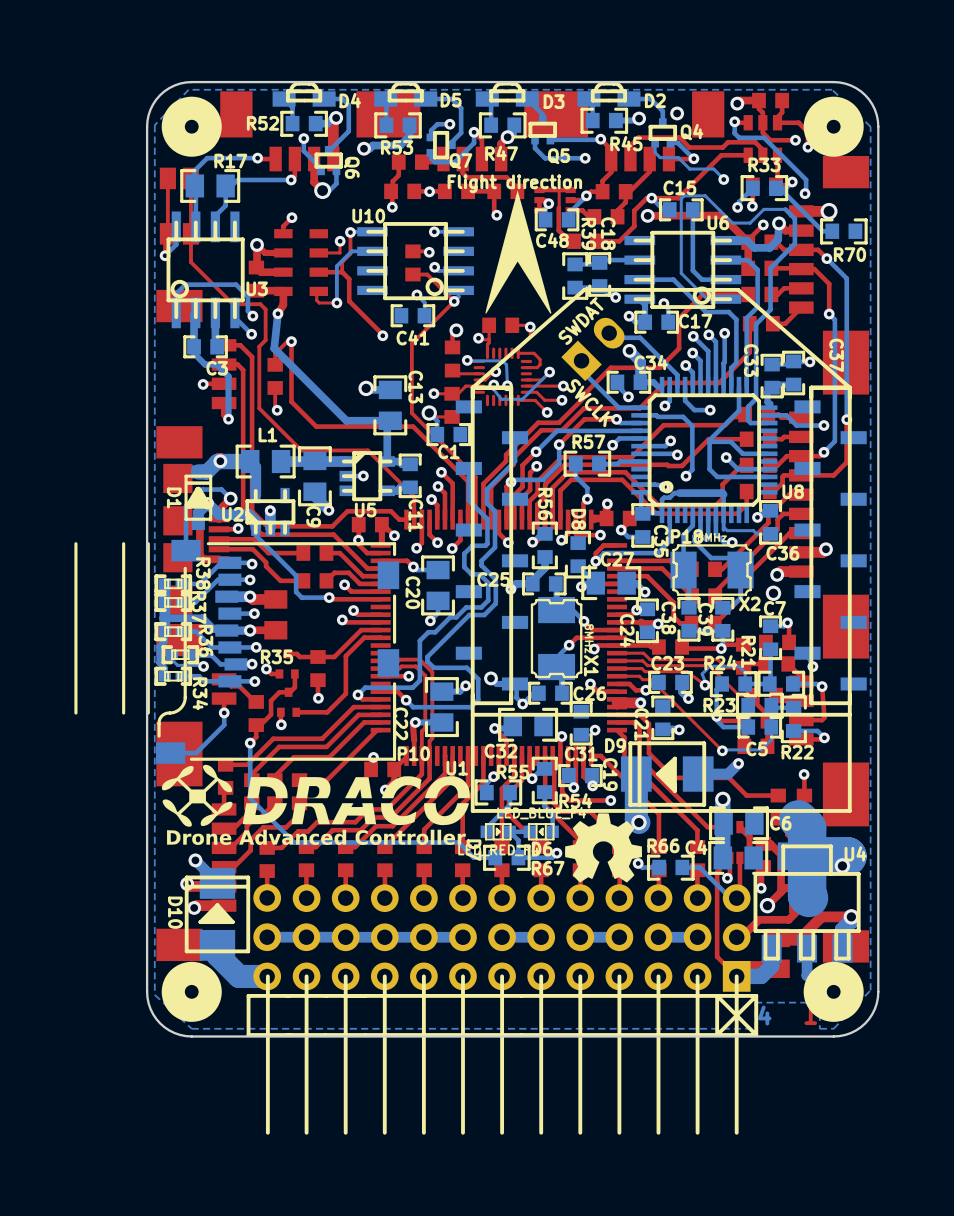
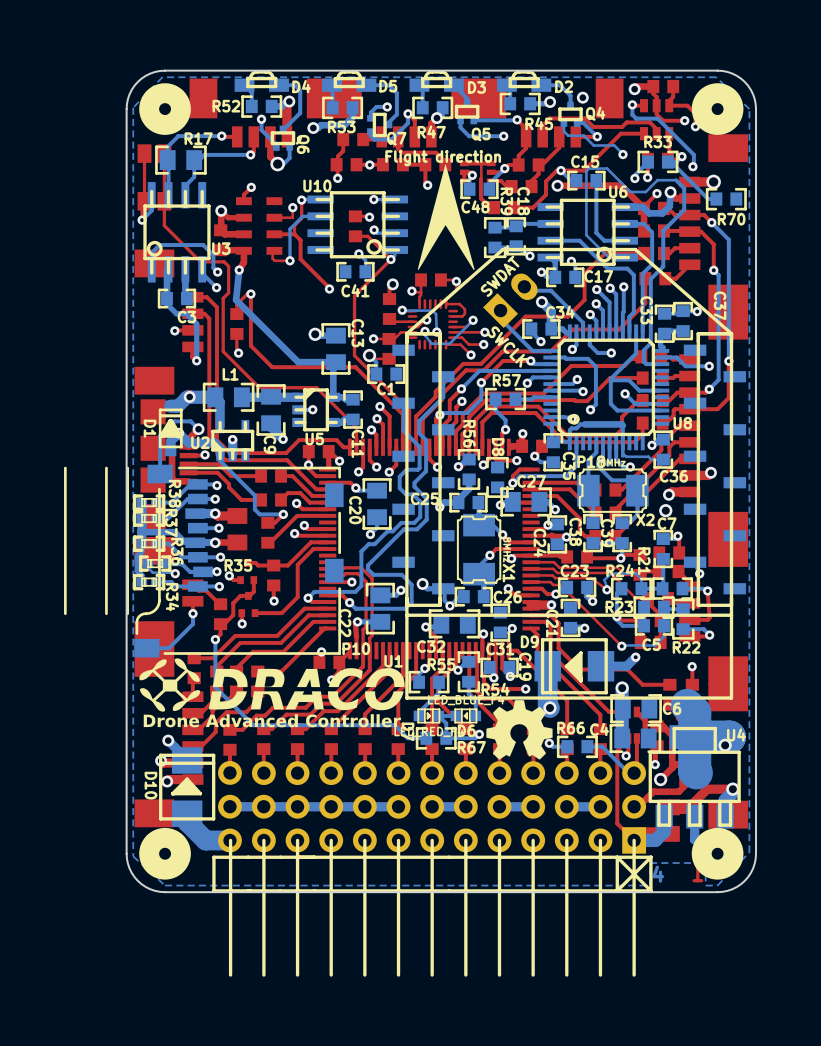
top track: none -> (283, 514) (274, 522) (267, 522)
top track: (345, 599) (330, 599) -> (297, 515) (270, 542) (267, 542)
part: none -> (267, 532)

